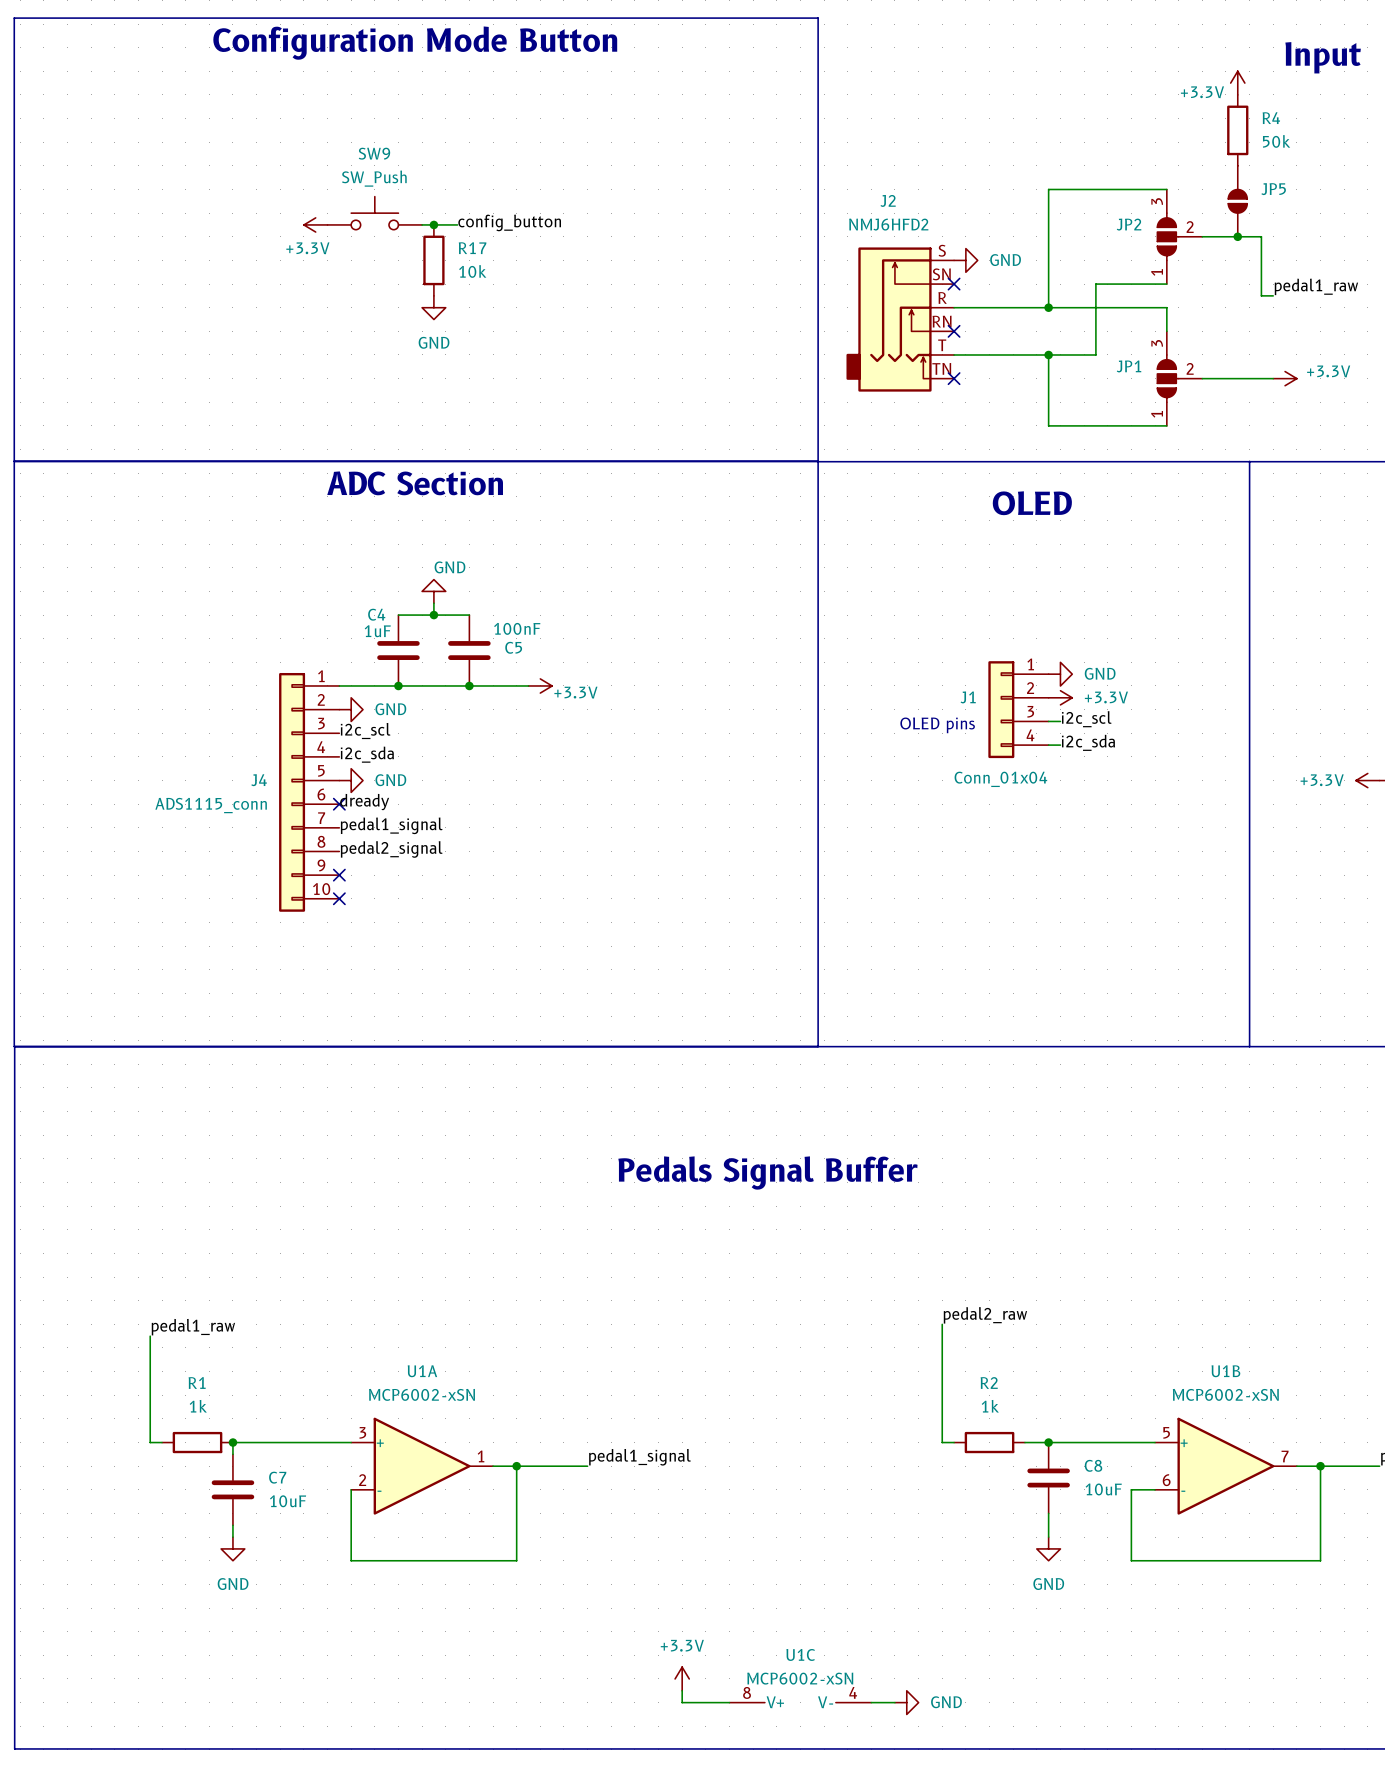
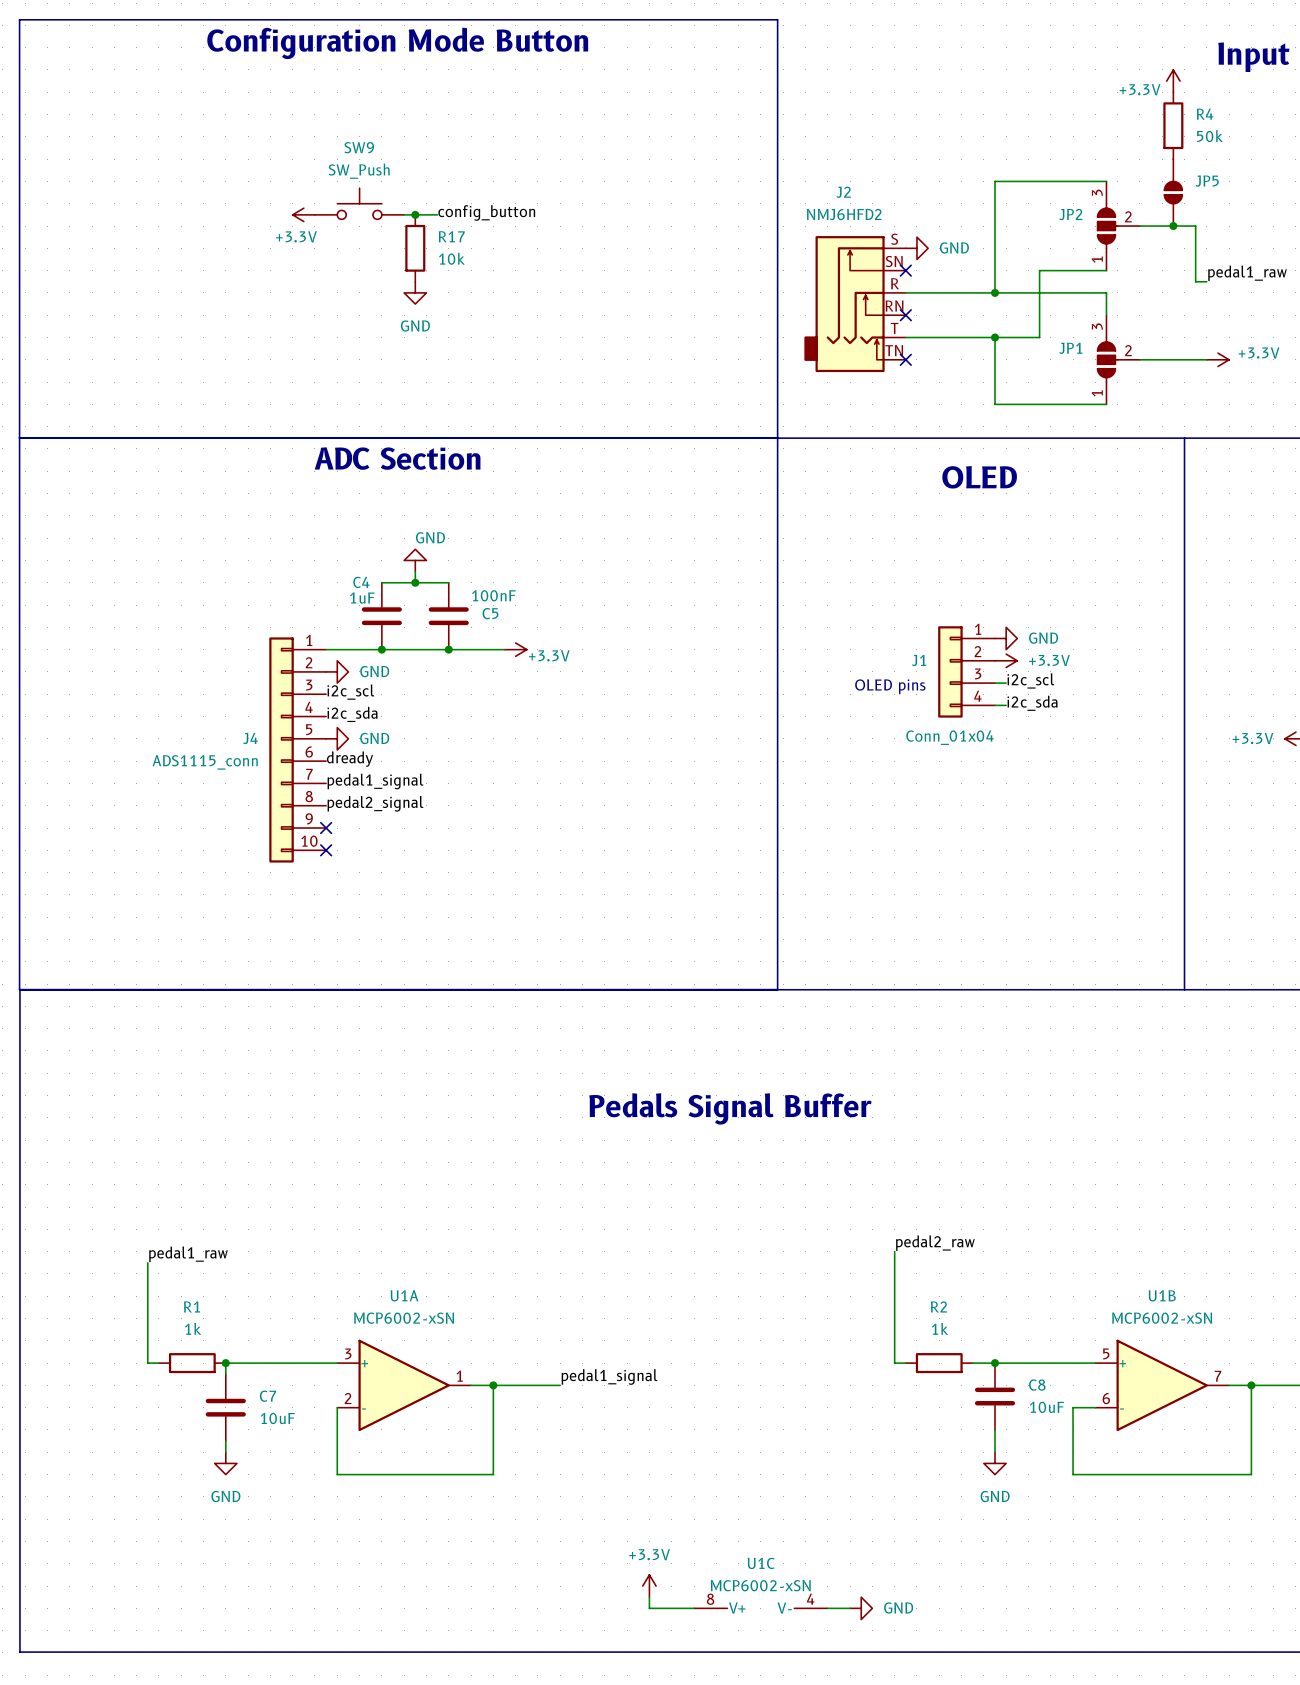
no-connect mark: (339, 804) -> none

